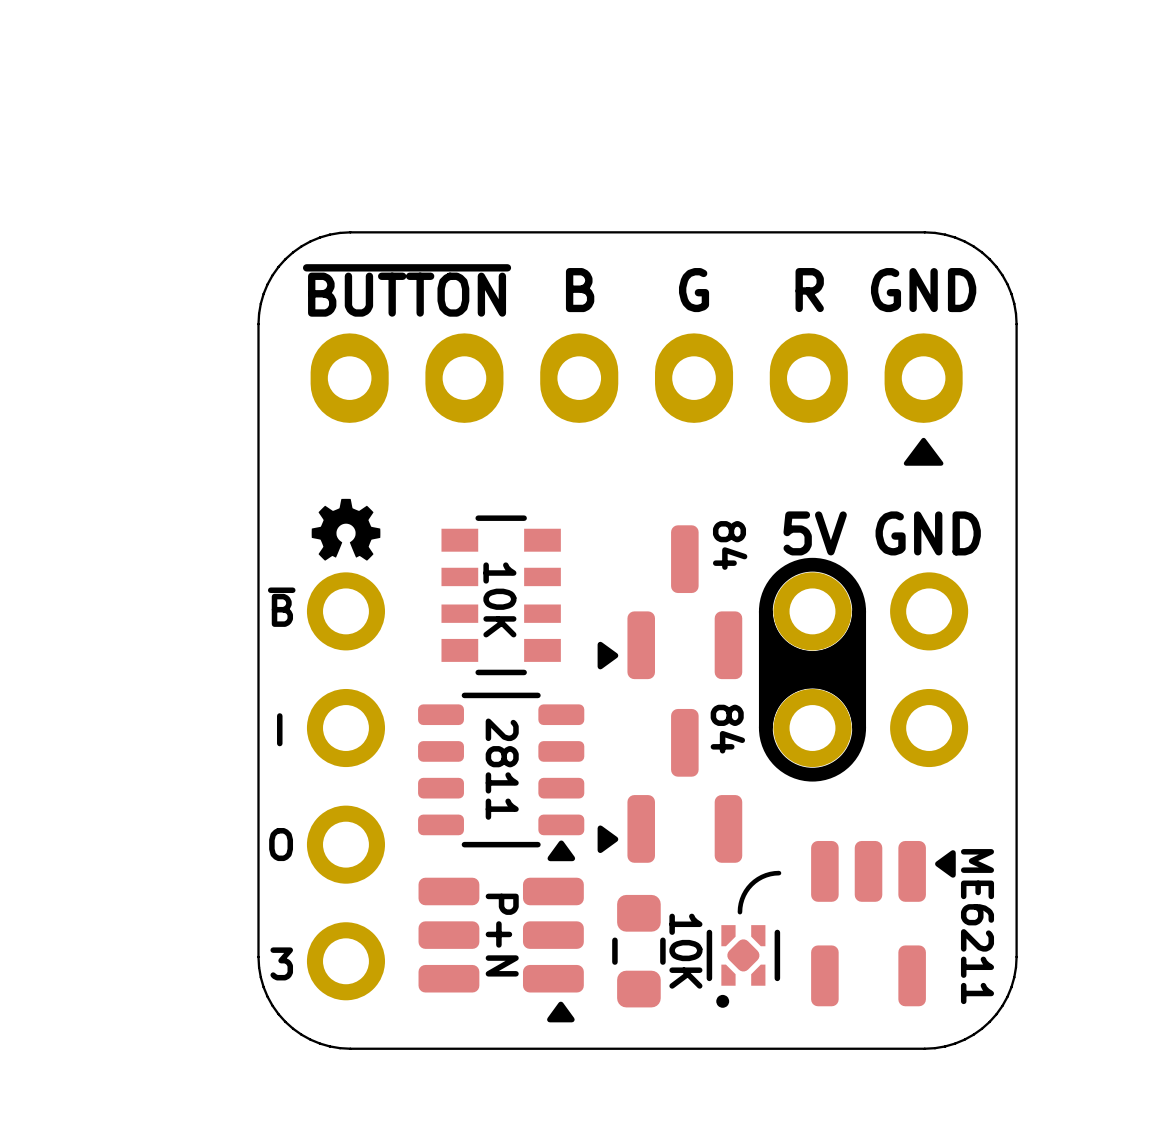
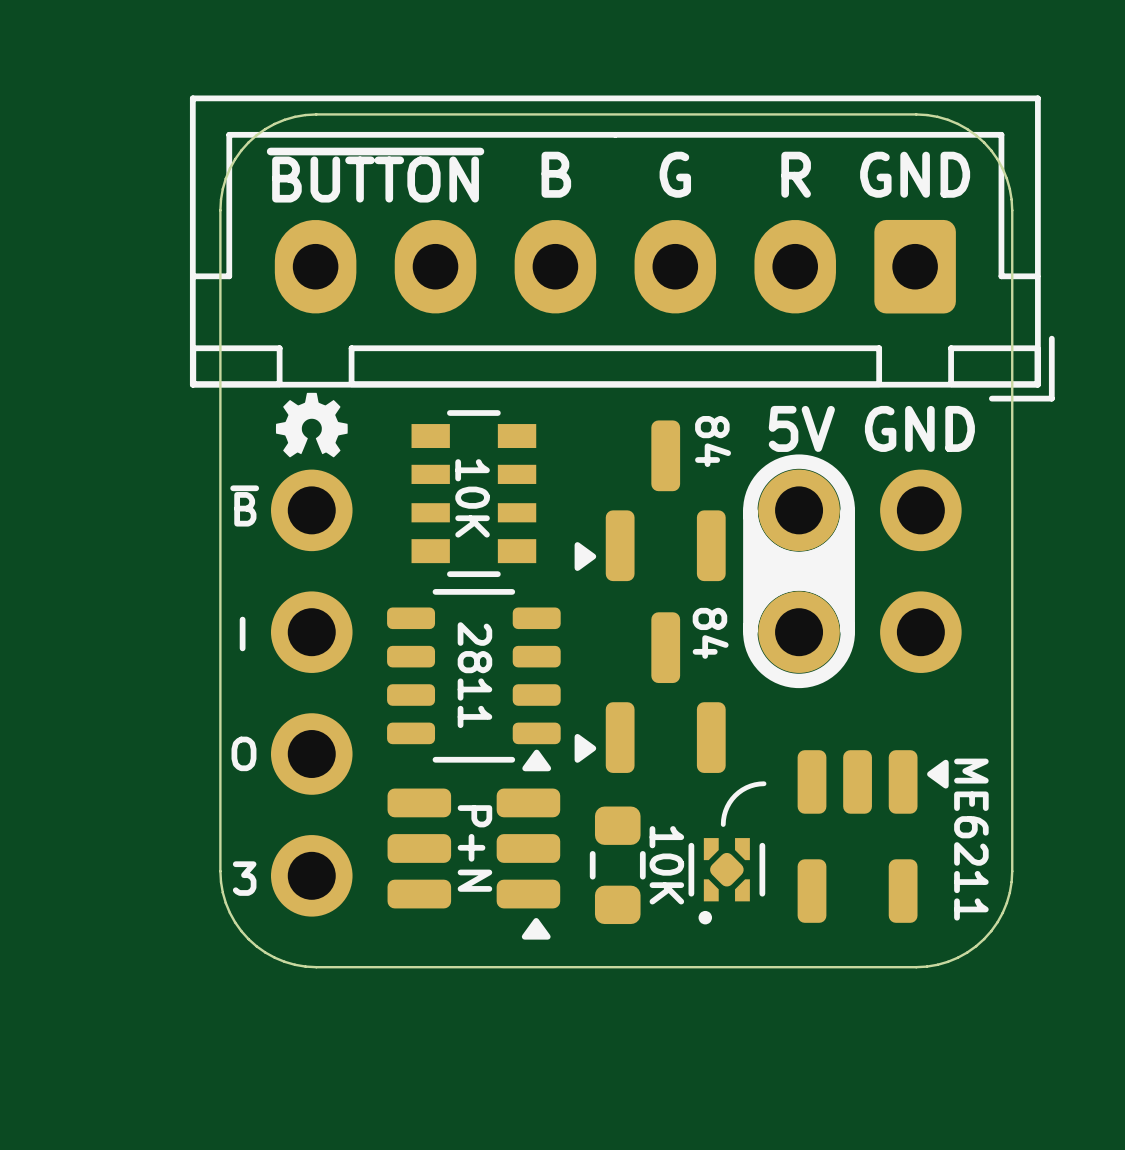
part footprint: [310, 333, 963, 466] -> [189, 95, 1055, 402]
part footprint: [418, 692, 585, 862] -> [387, 589, 561, 772]

